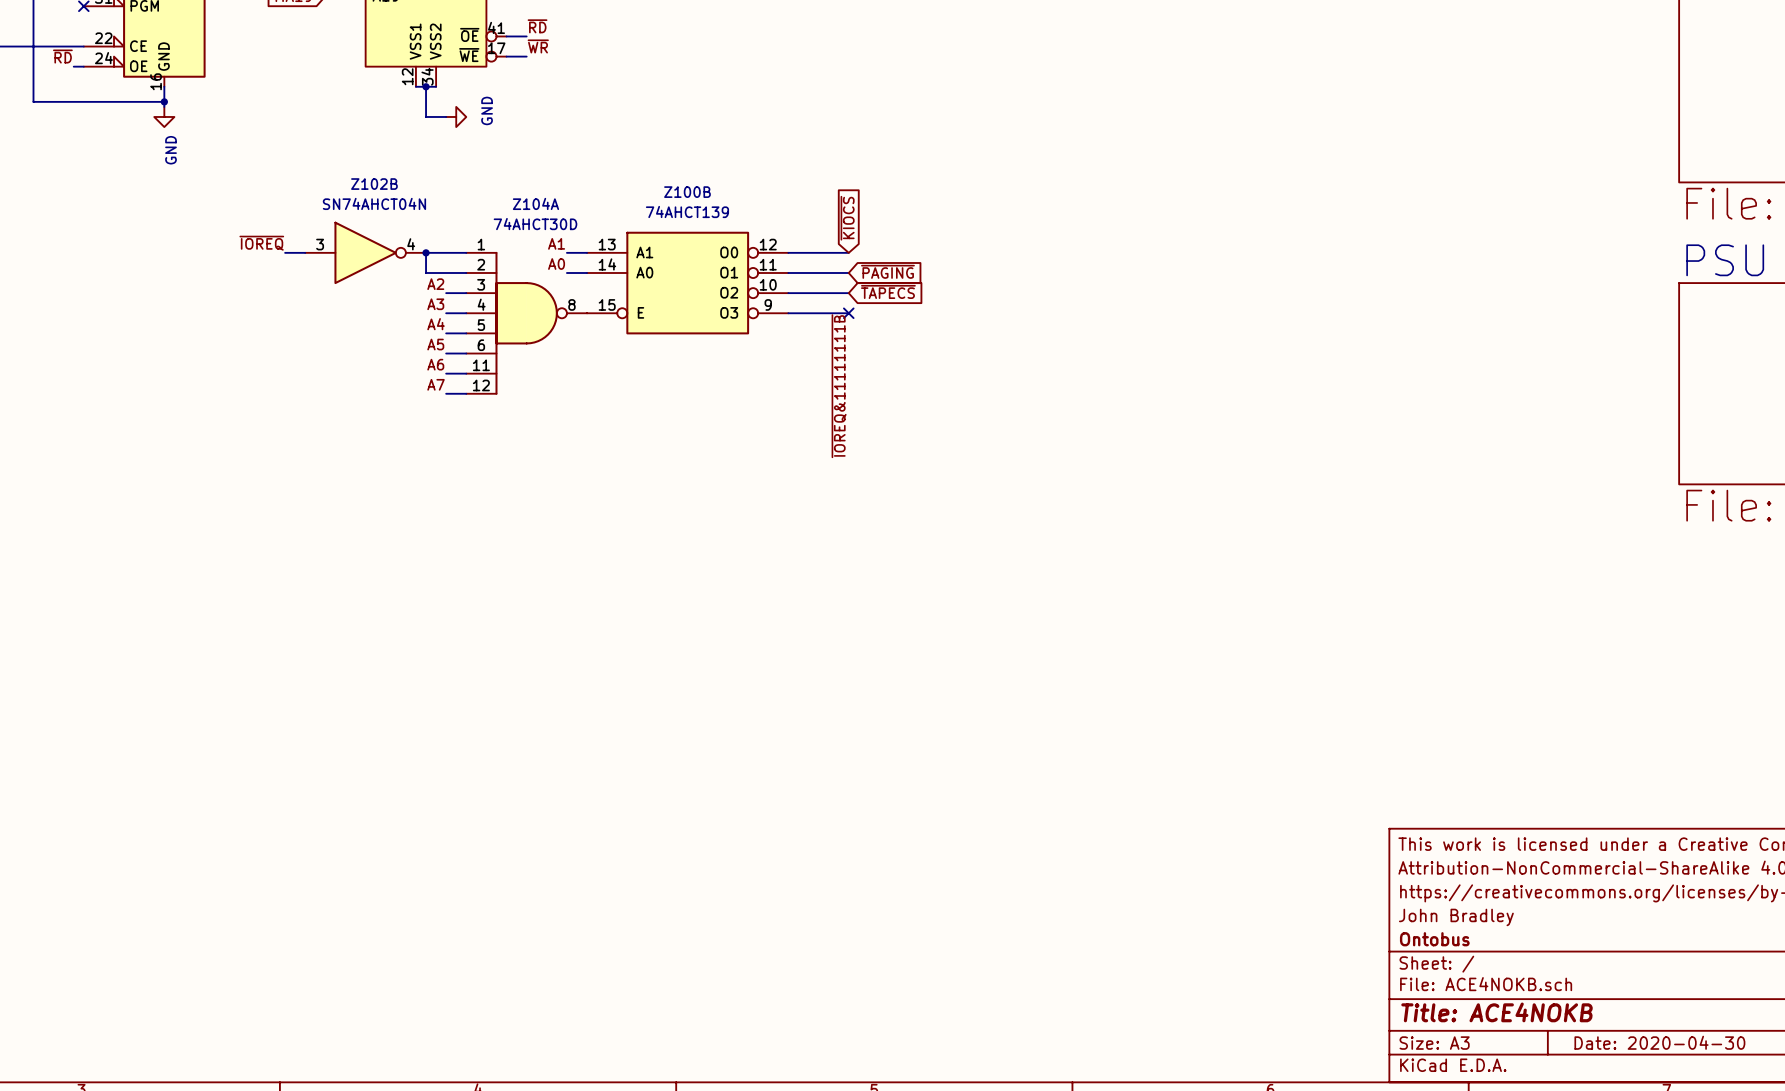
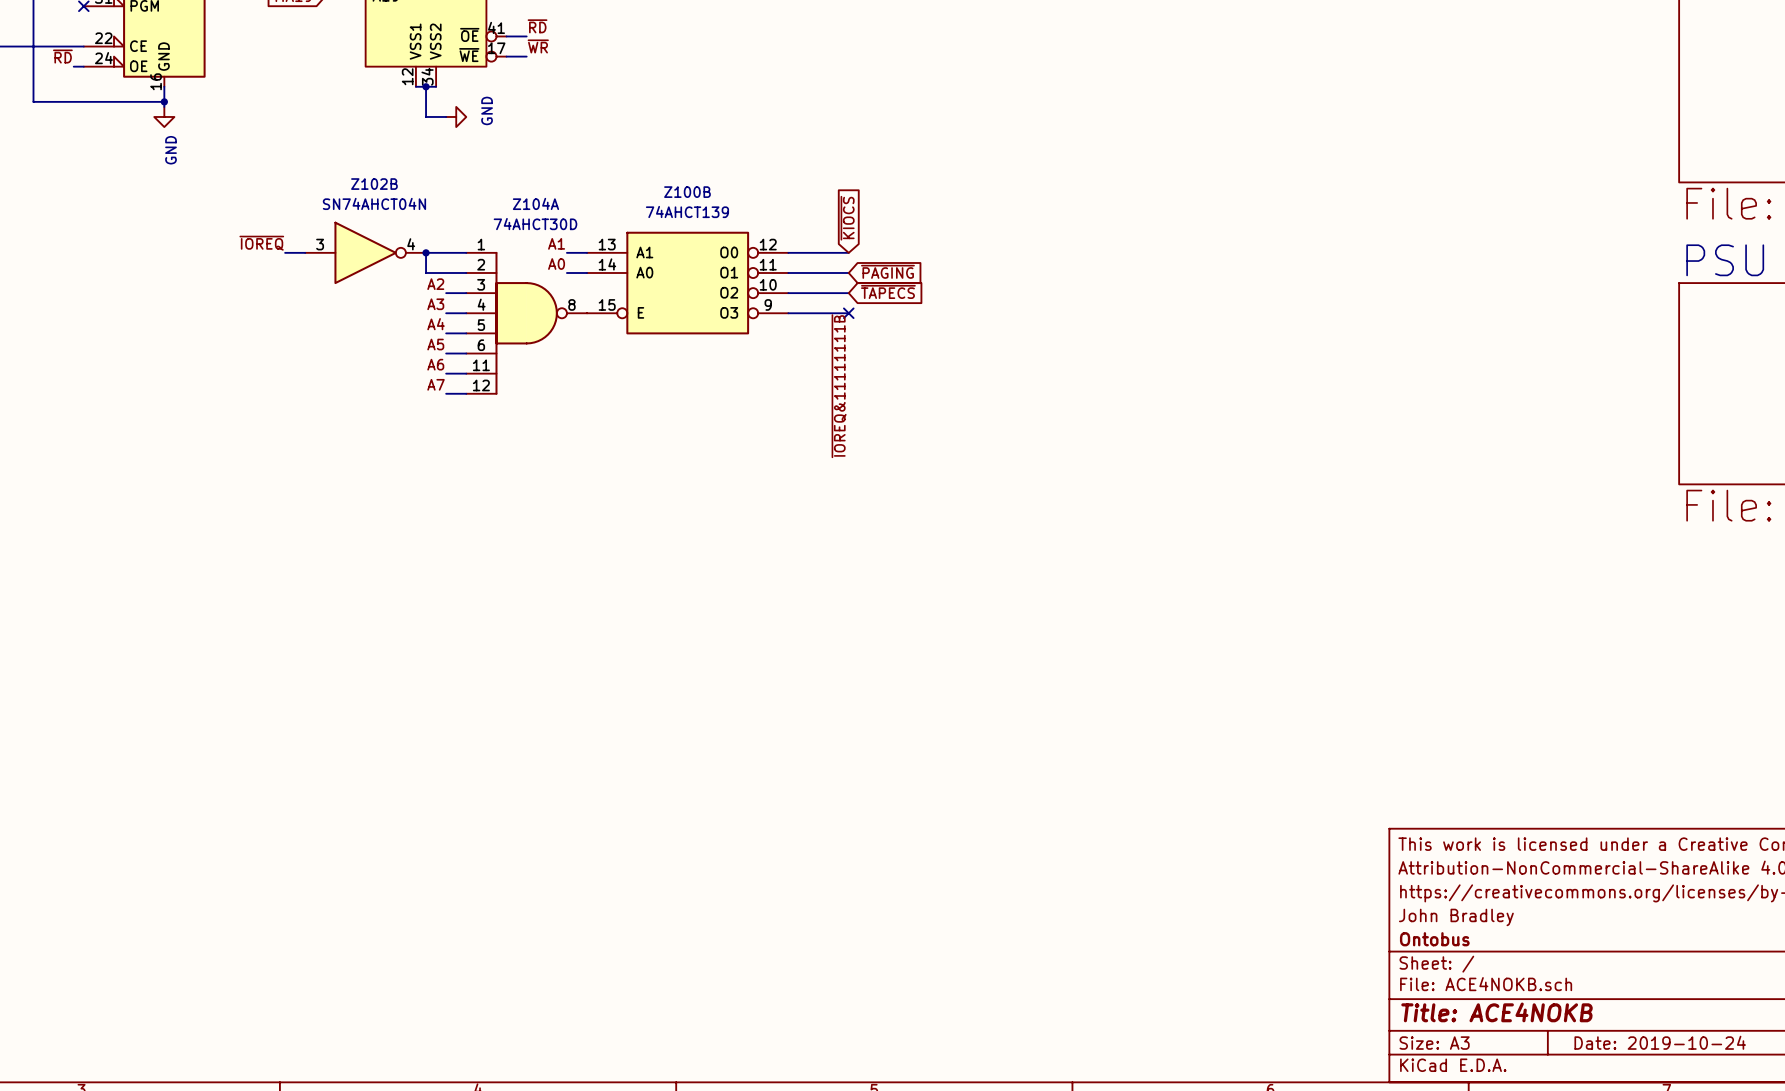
title block: Date: 2020-04-30 (1659, 1042) -> Date: 2019-10-24 (1660, 1042)

